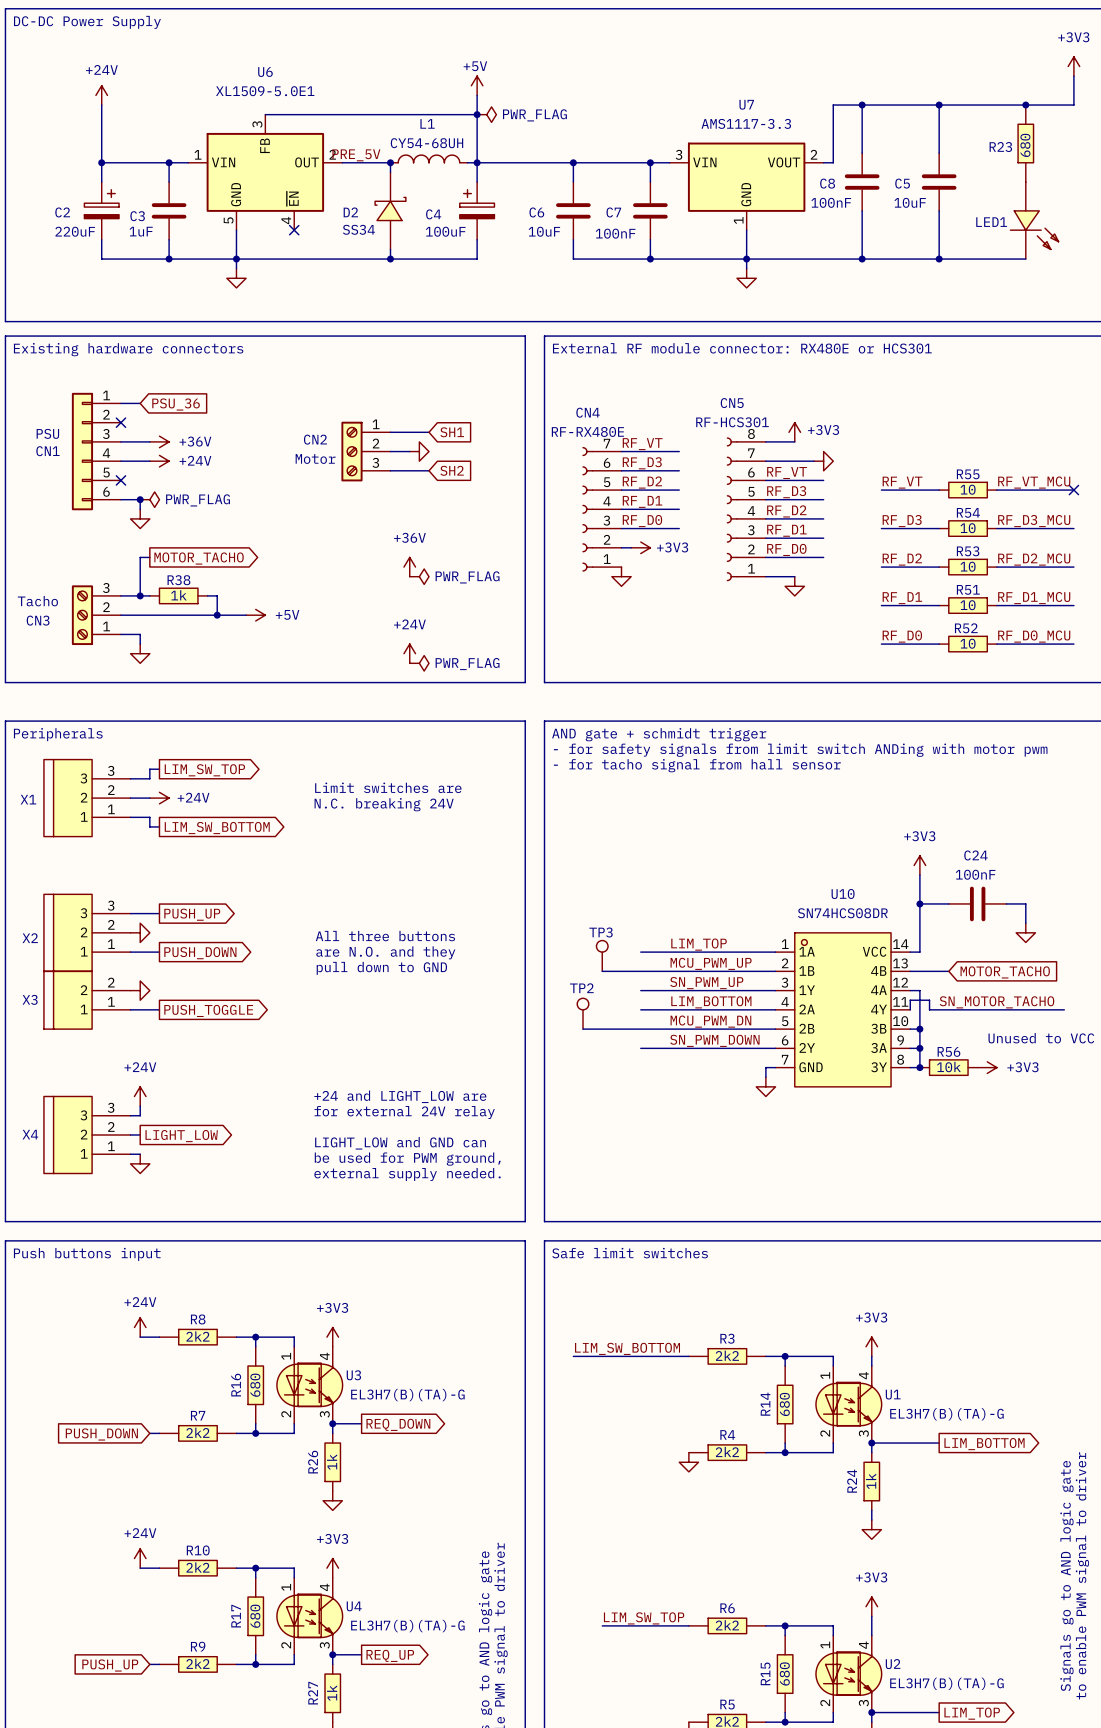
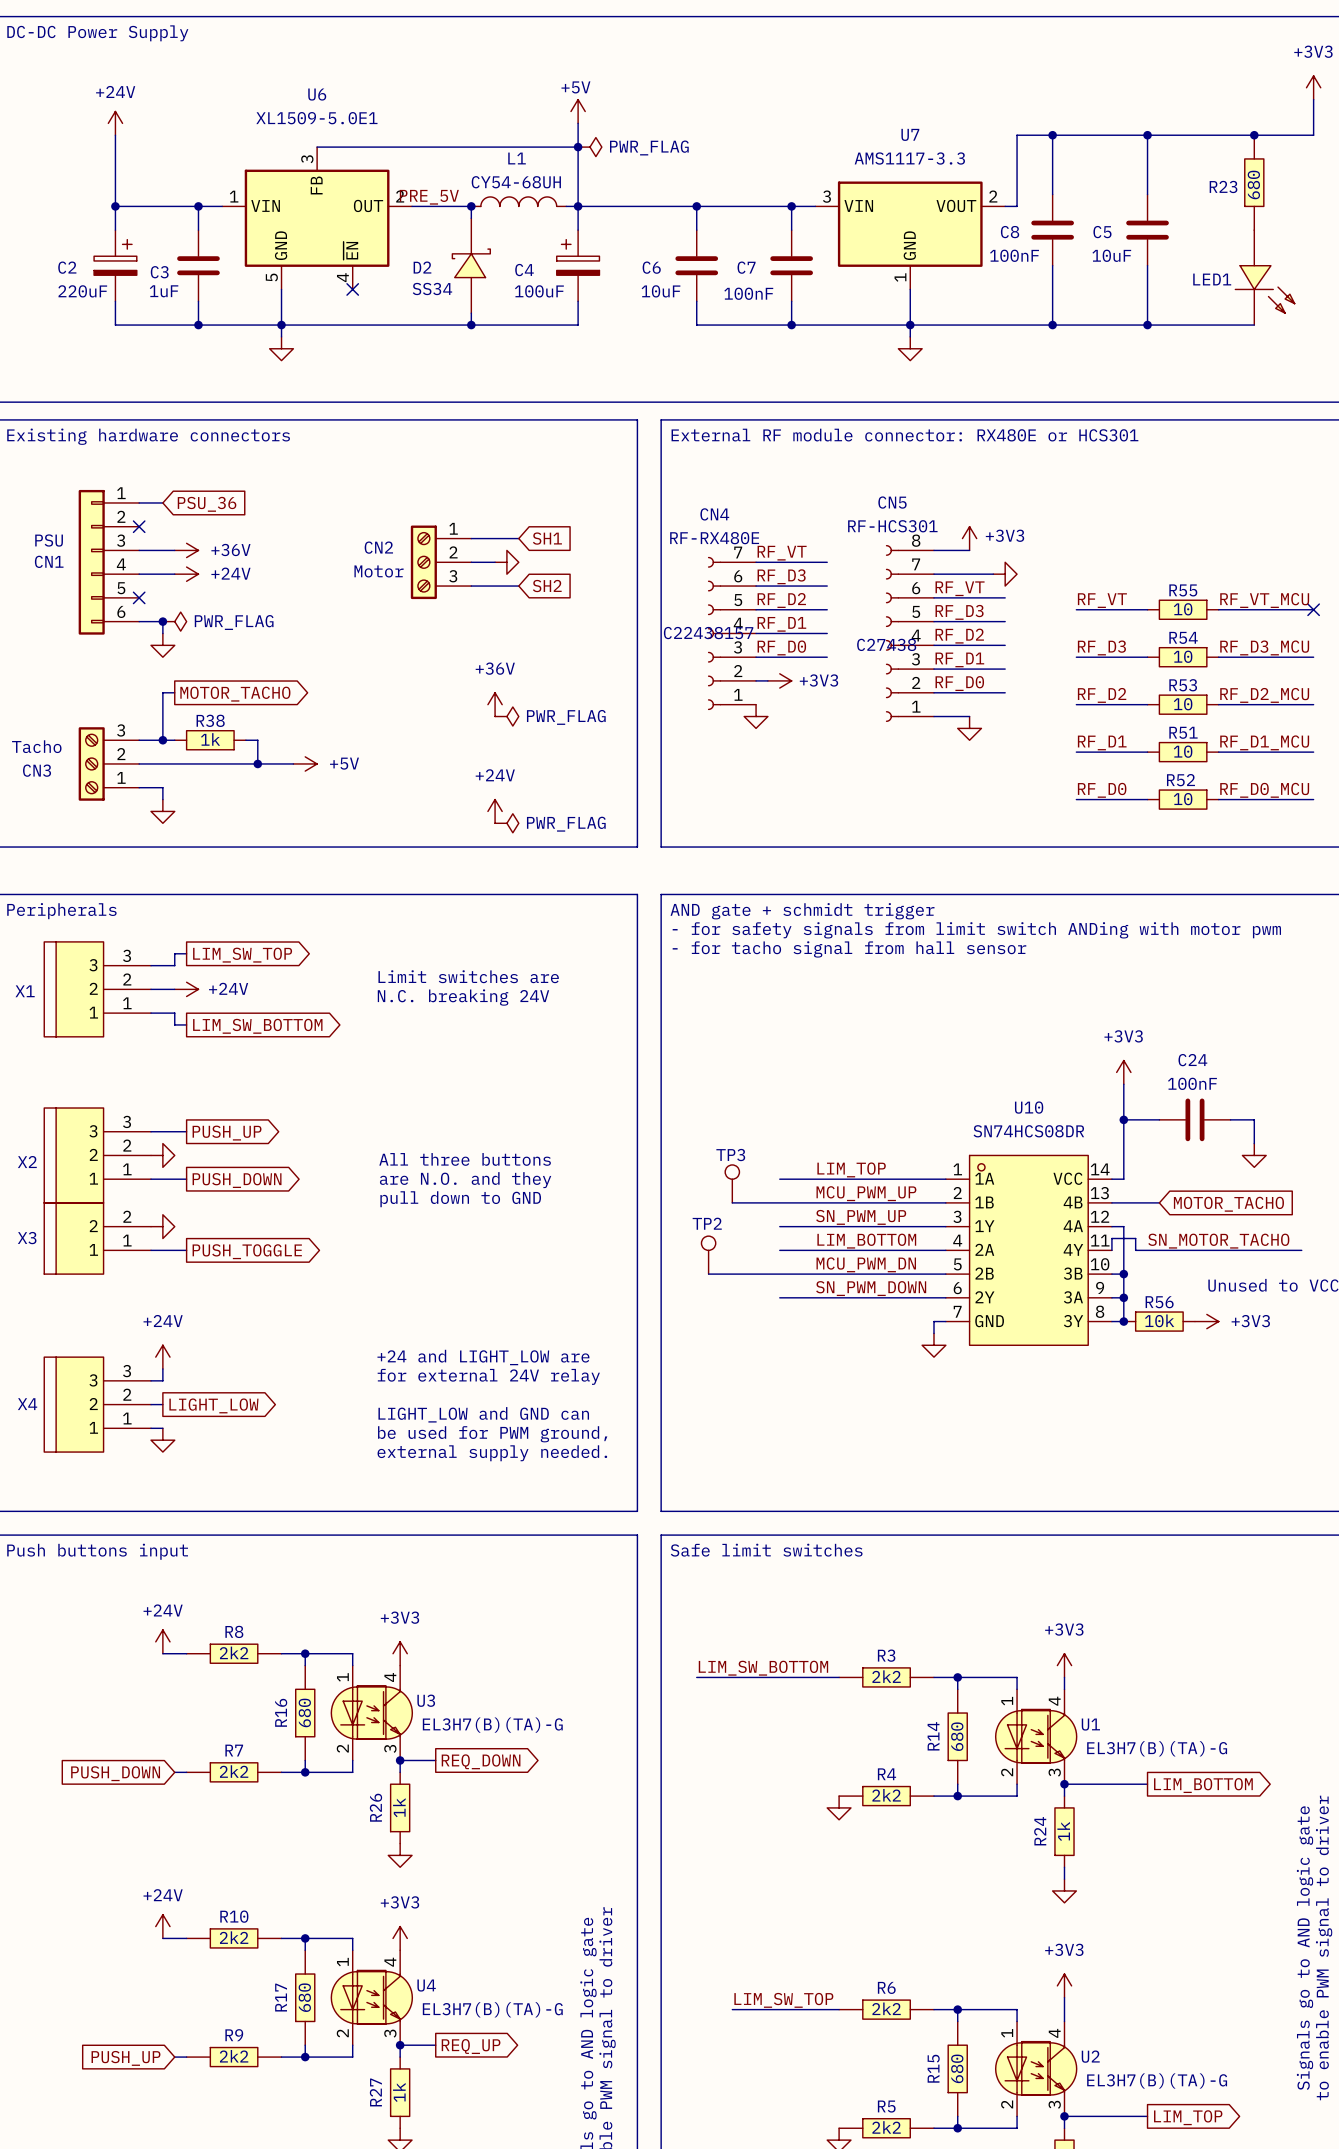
CN4 text: none -> C22438157 (708, 633)
CN5 text: none -> C27438 (886, 644)

